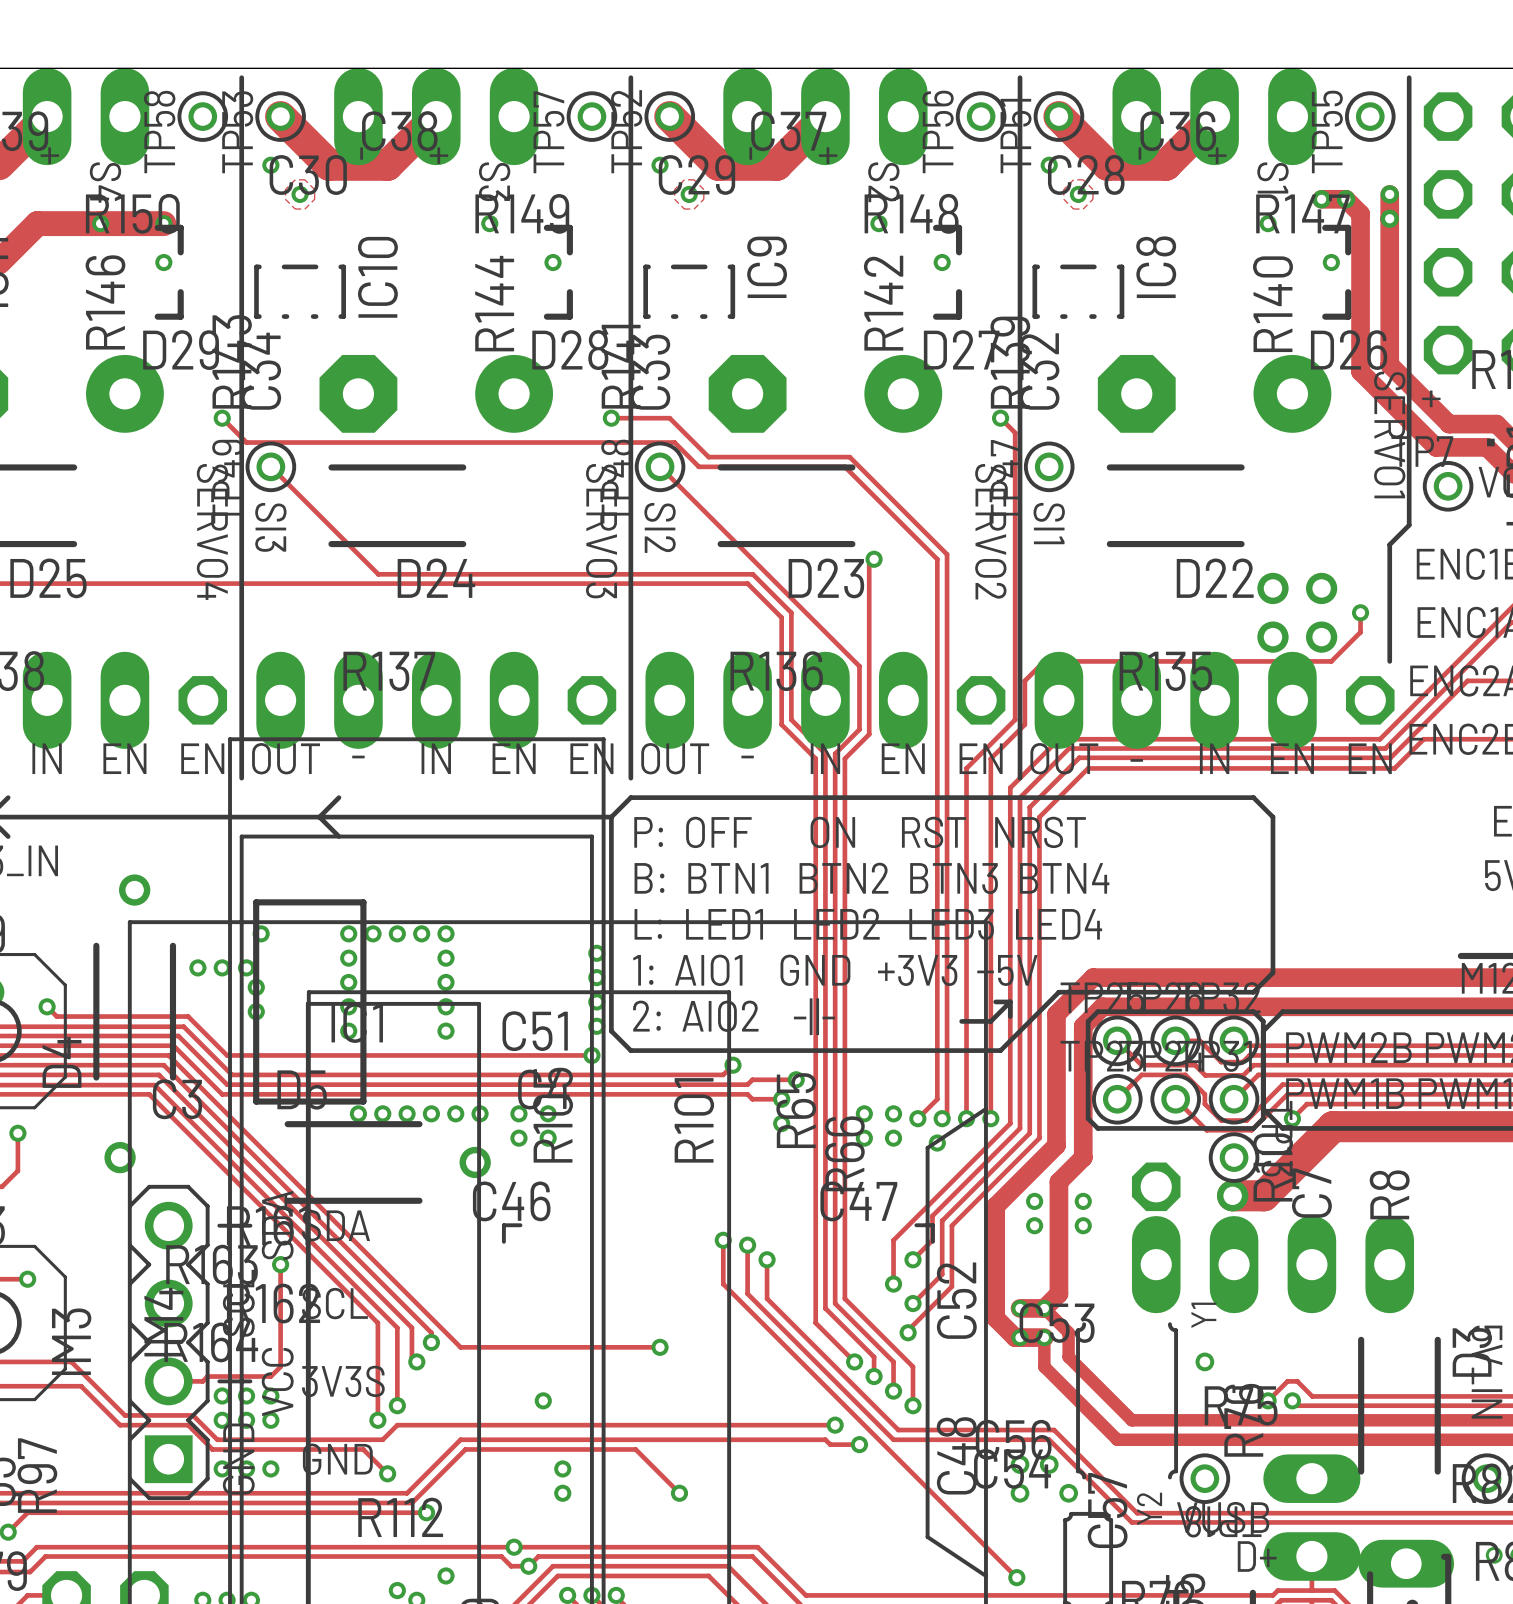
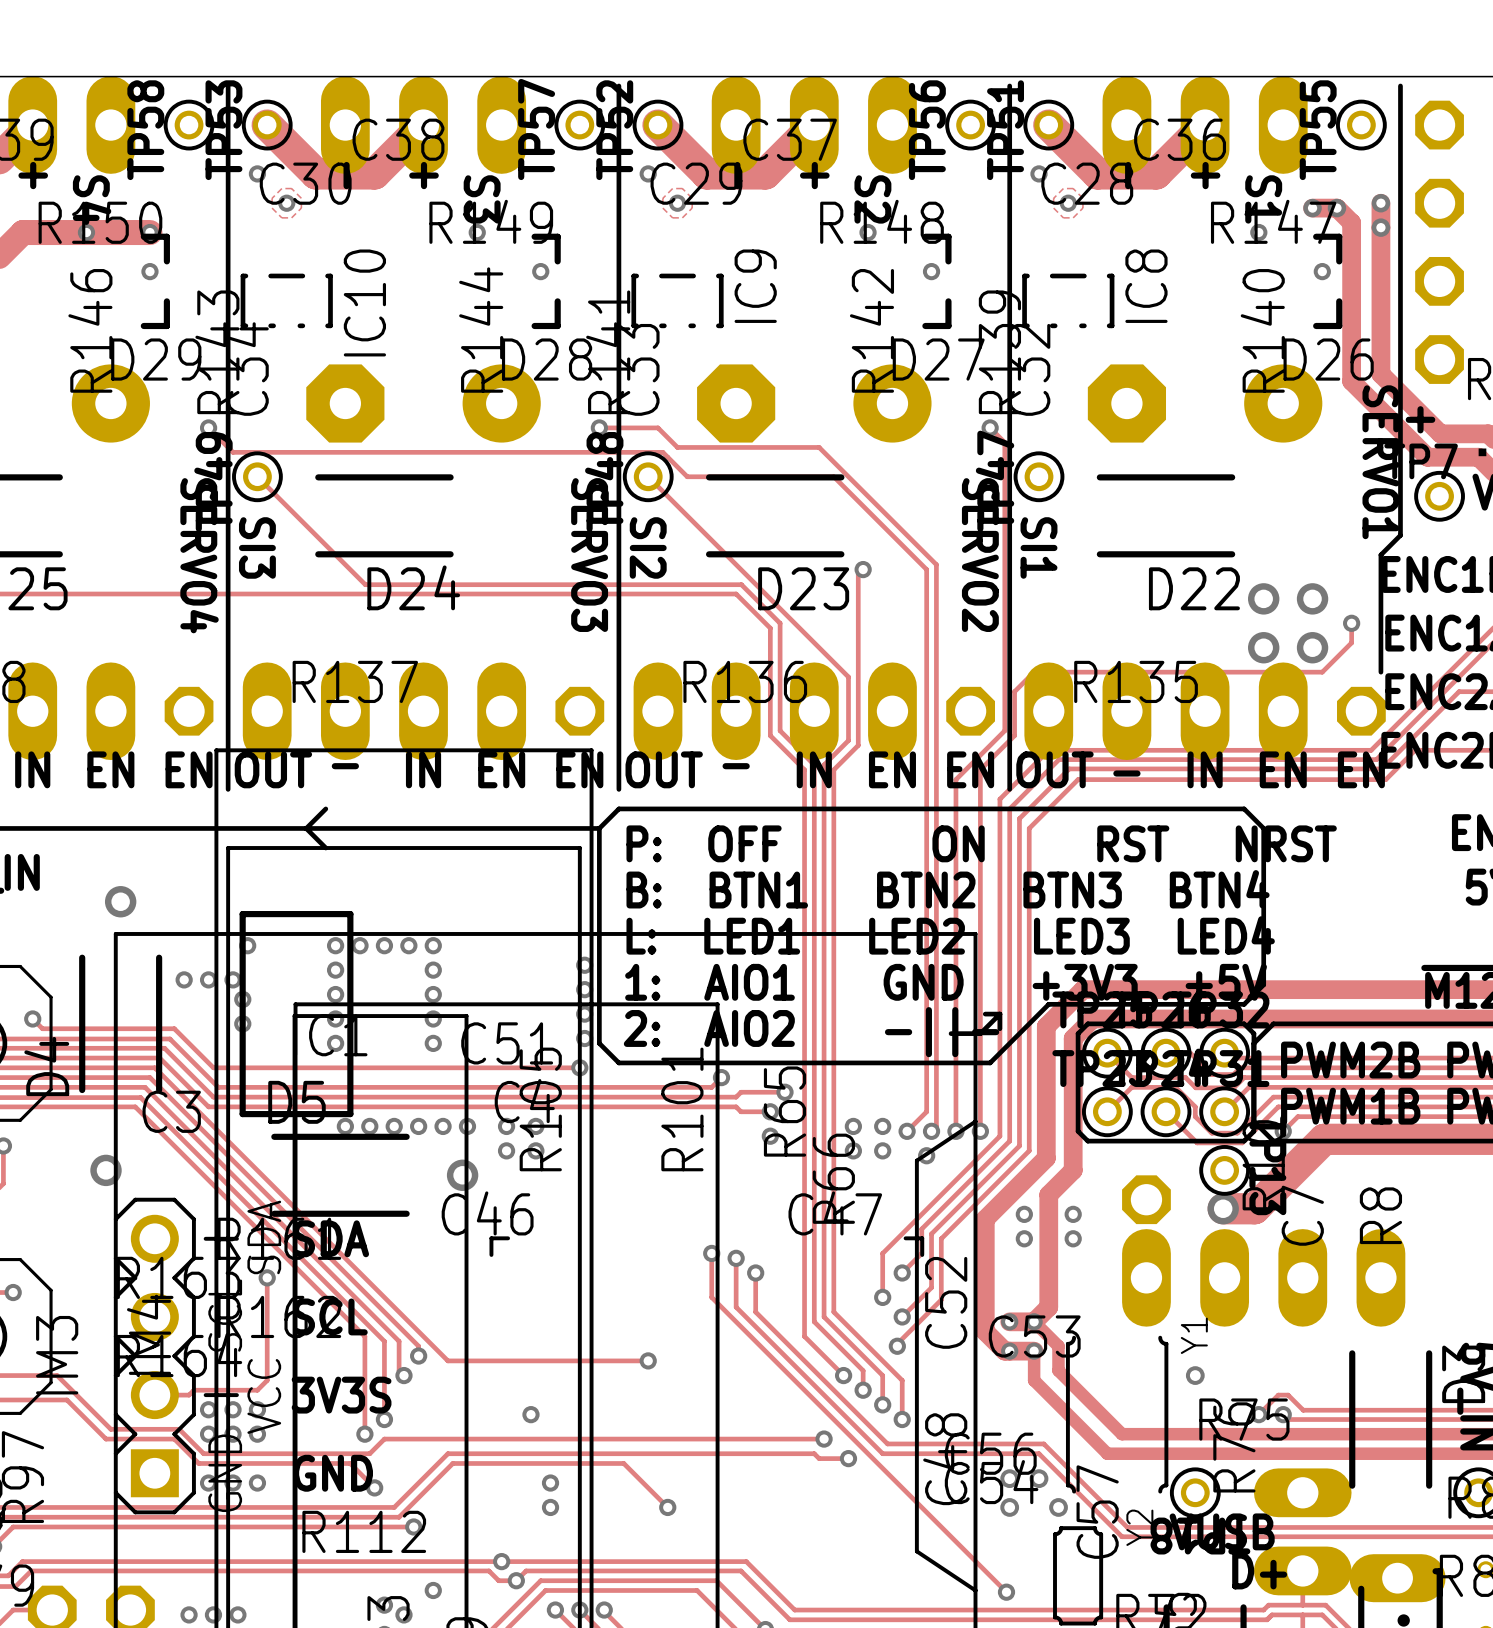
track: (689, 437) (708, 457) (849, 457) -> (677, 447) (819, 447) (838, 466)

